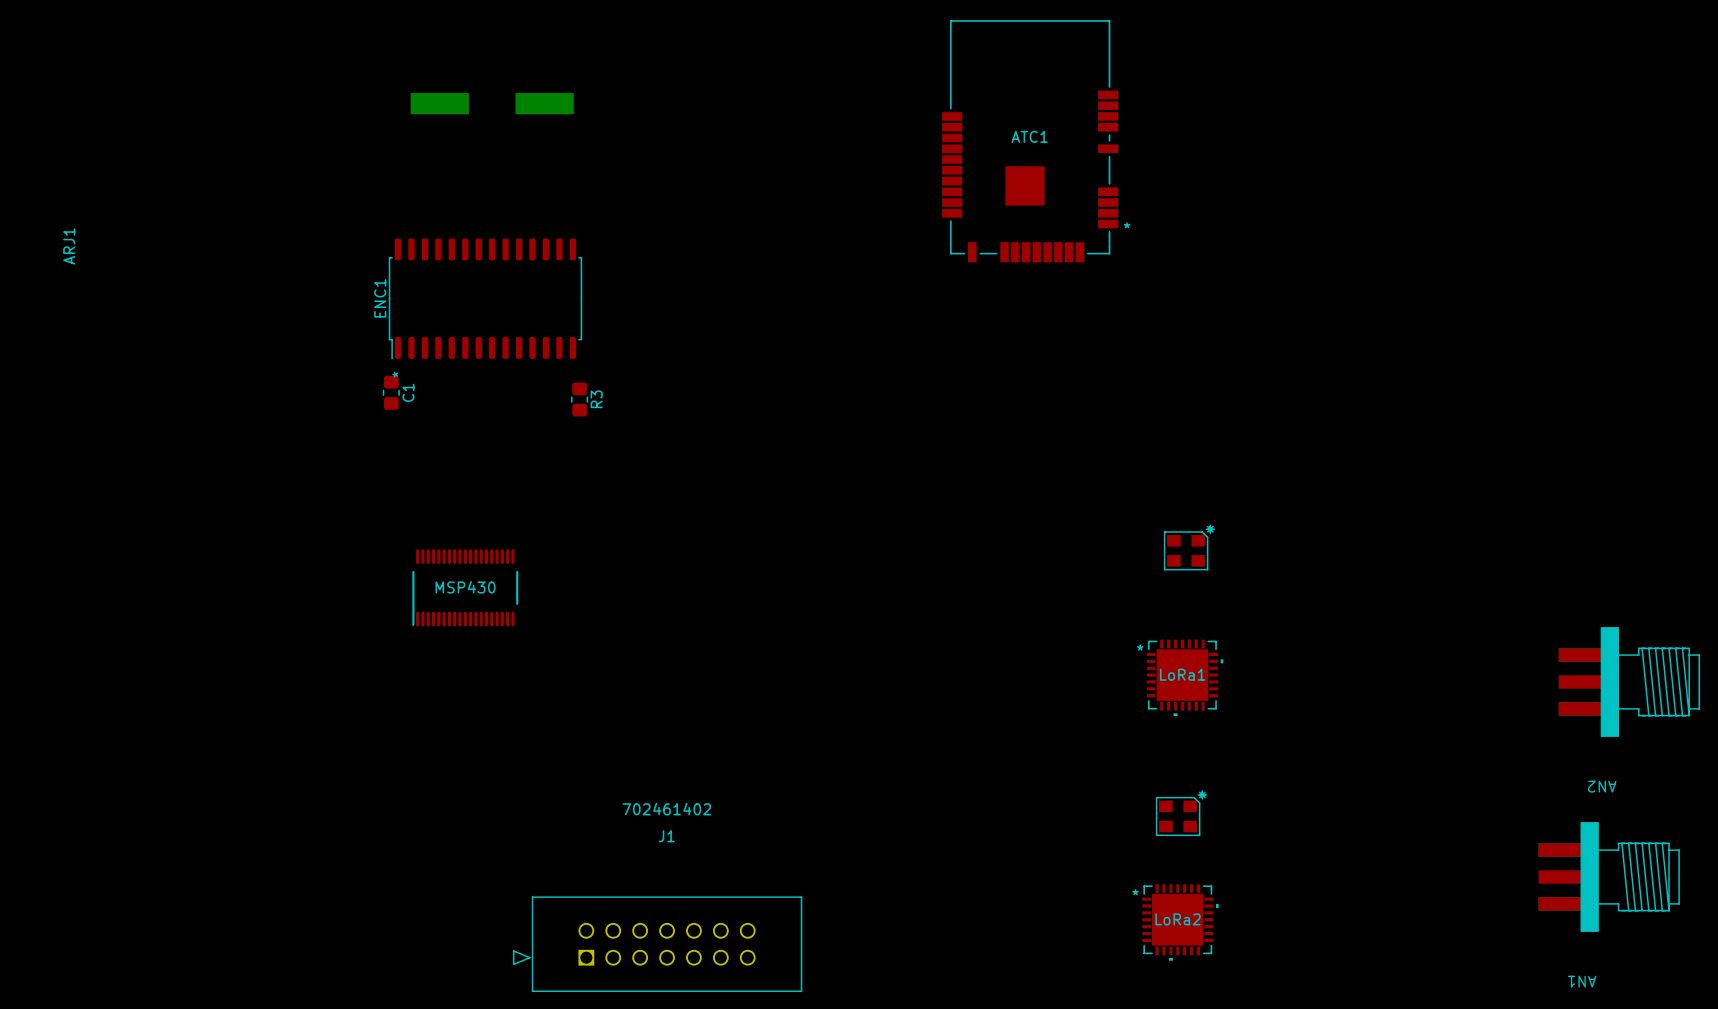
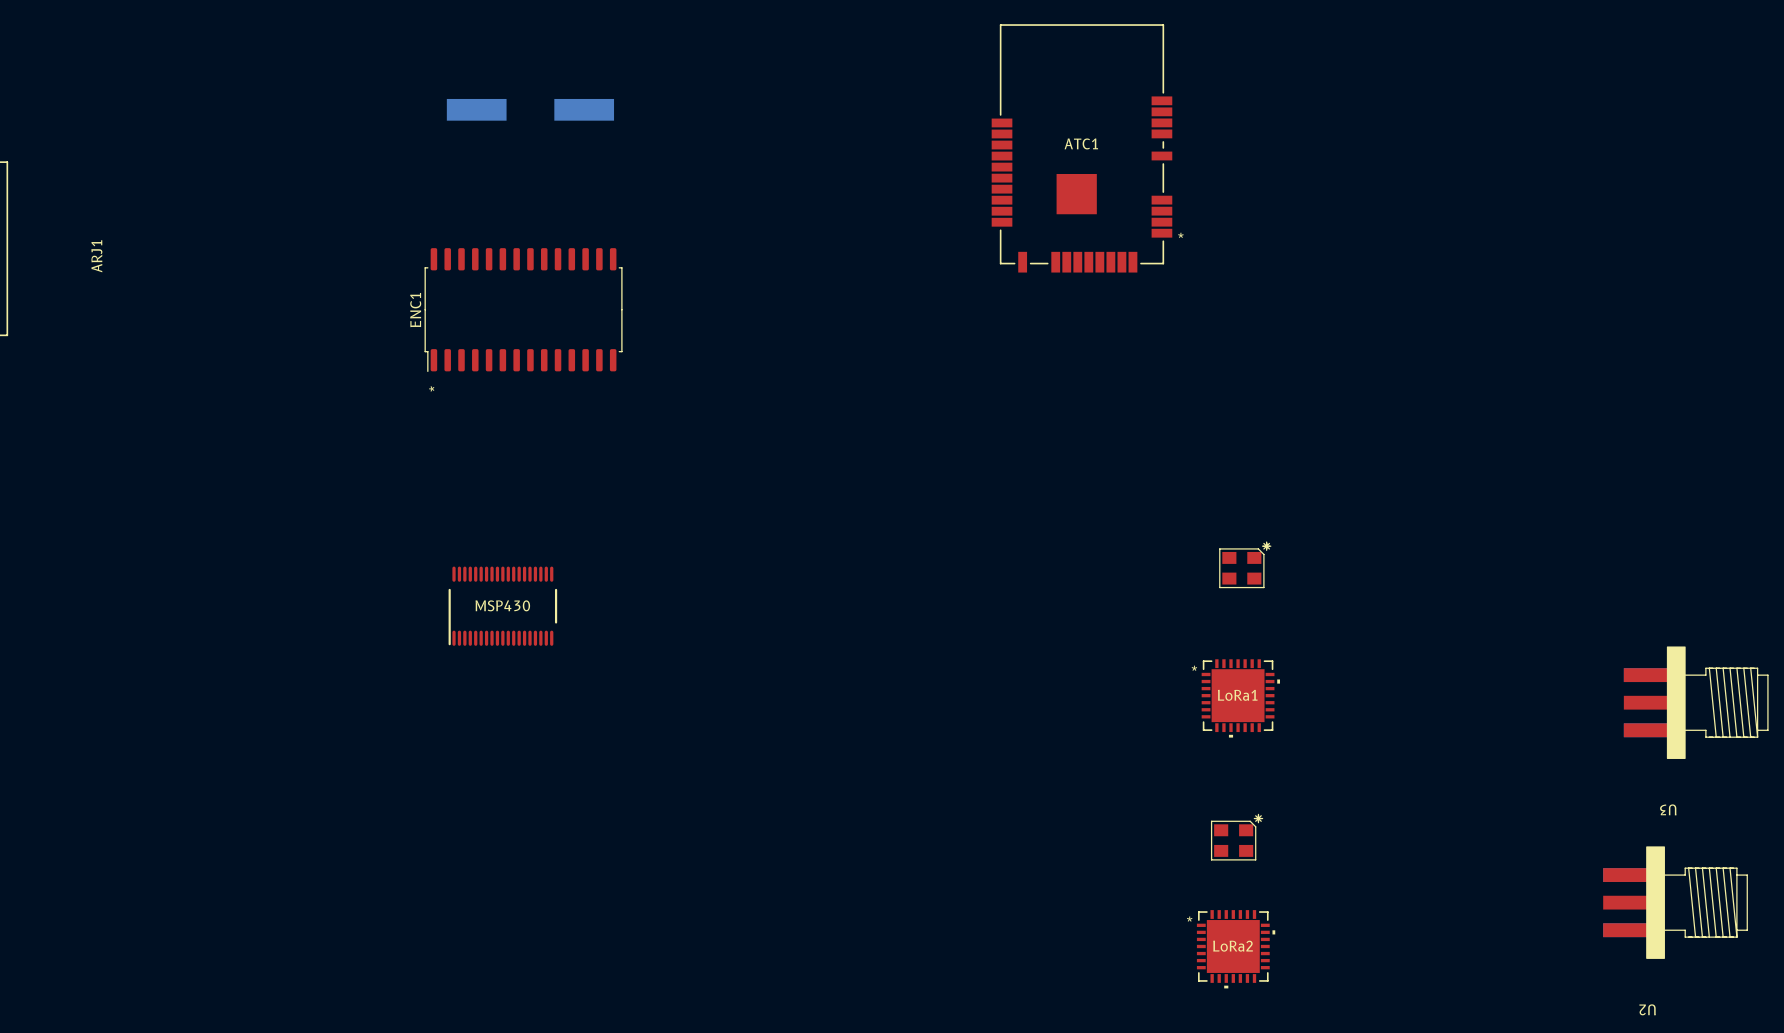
C1: (391, 392) -> none
R3: (579, 399) -> none
AN2 name: AN2 (1602, 786) -> U3 (1668, 809)
J1: (657, 944) -> none
AN1 name: AN1 (1582, 981) -> U2 (1647, 1009)

